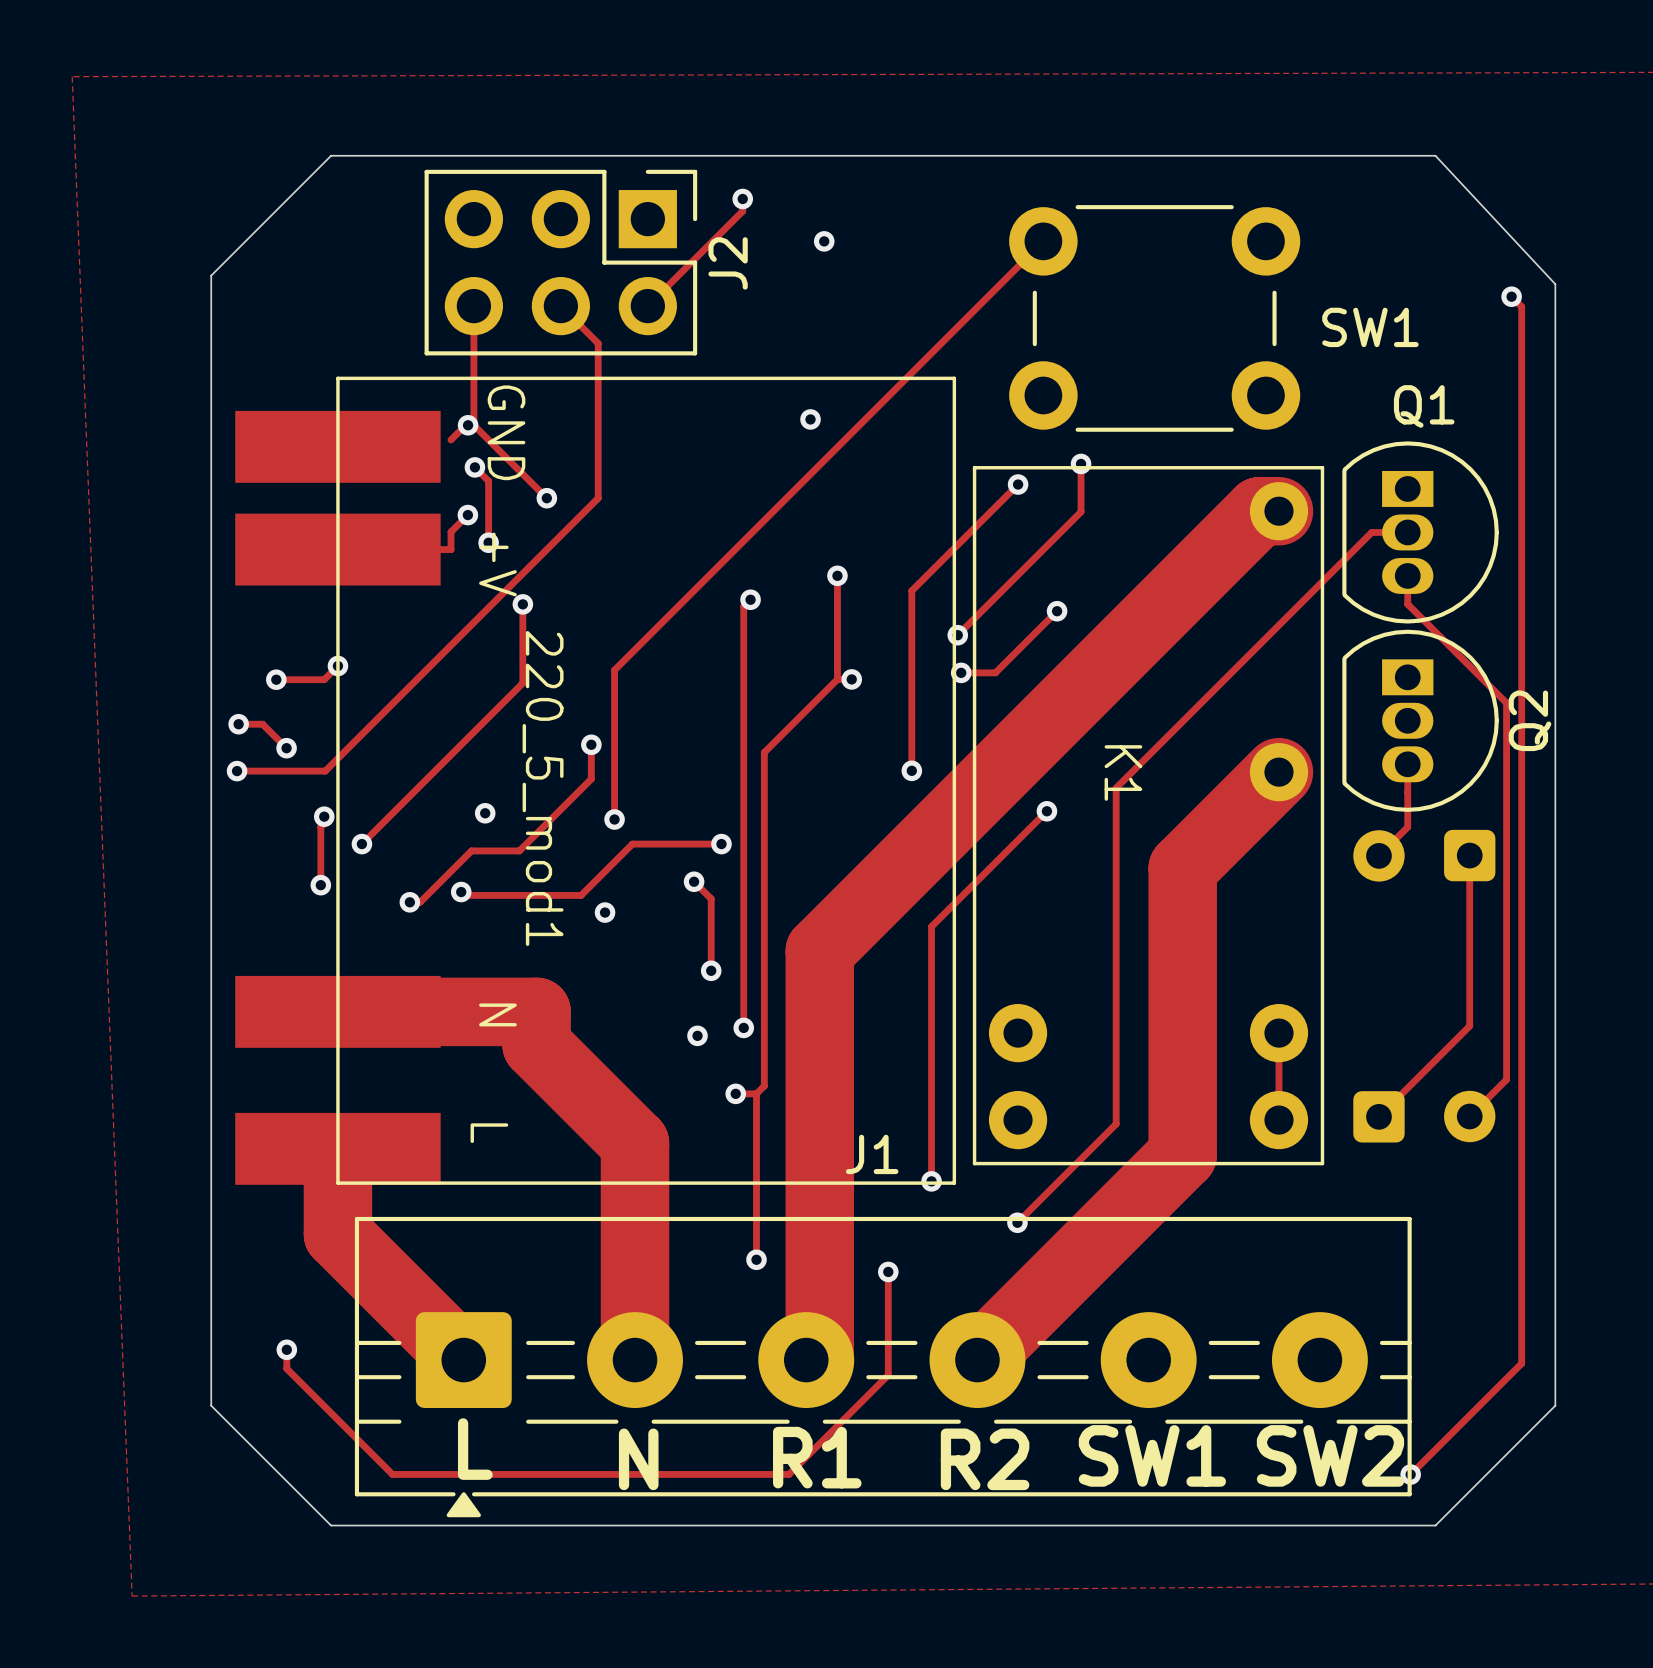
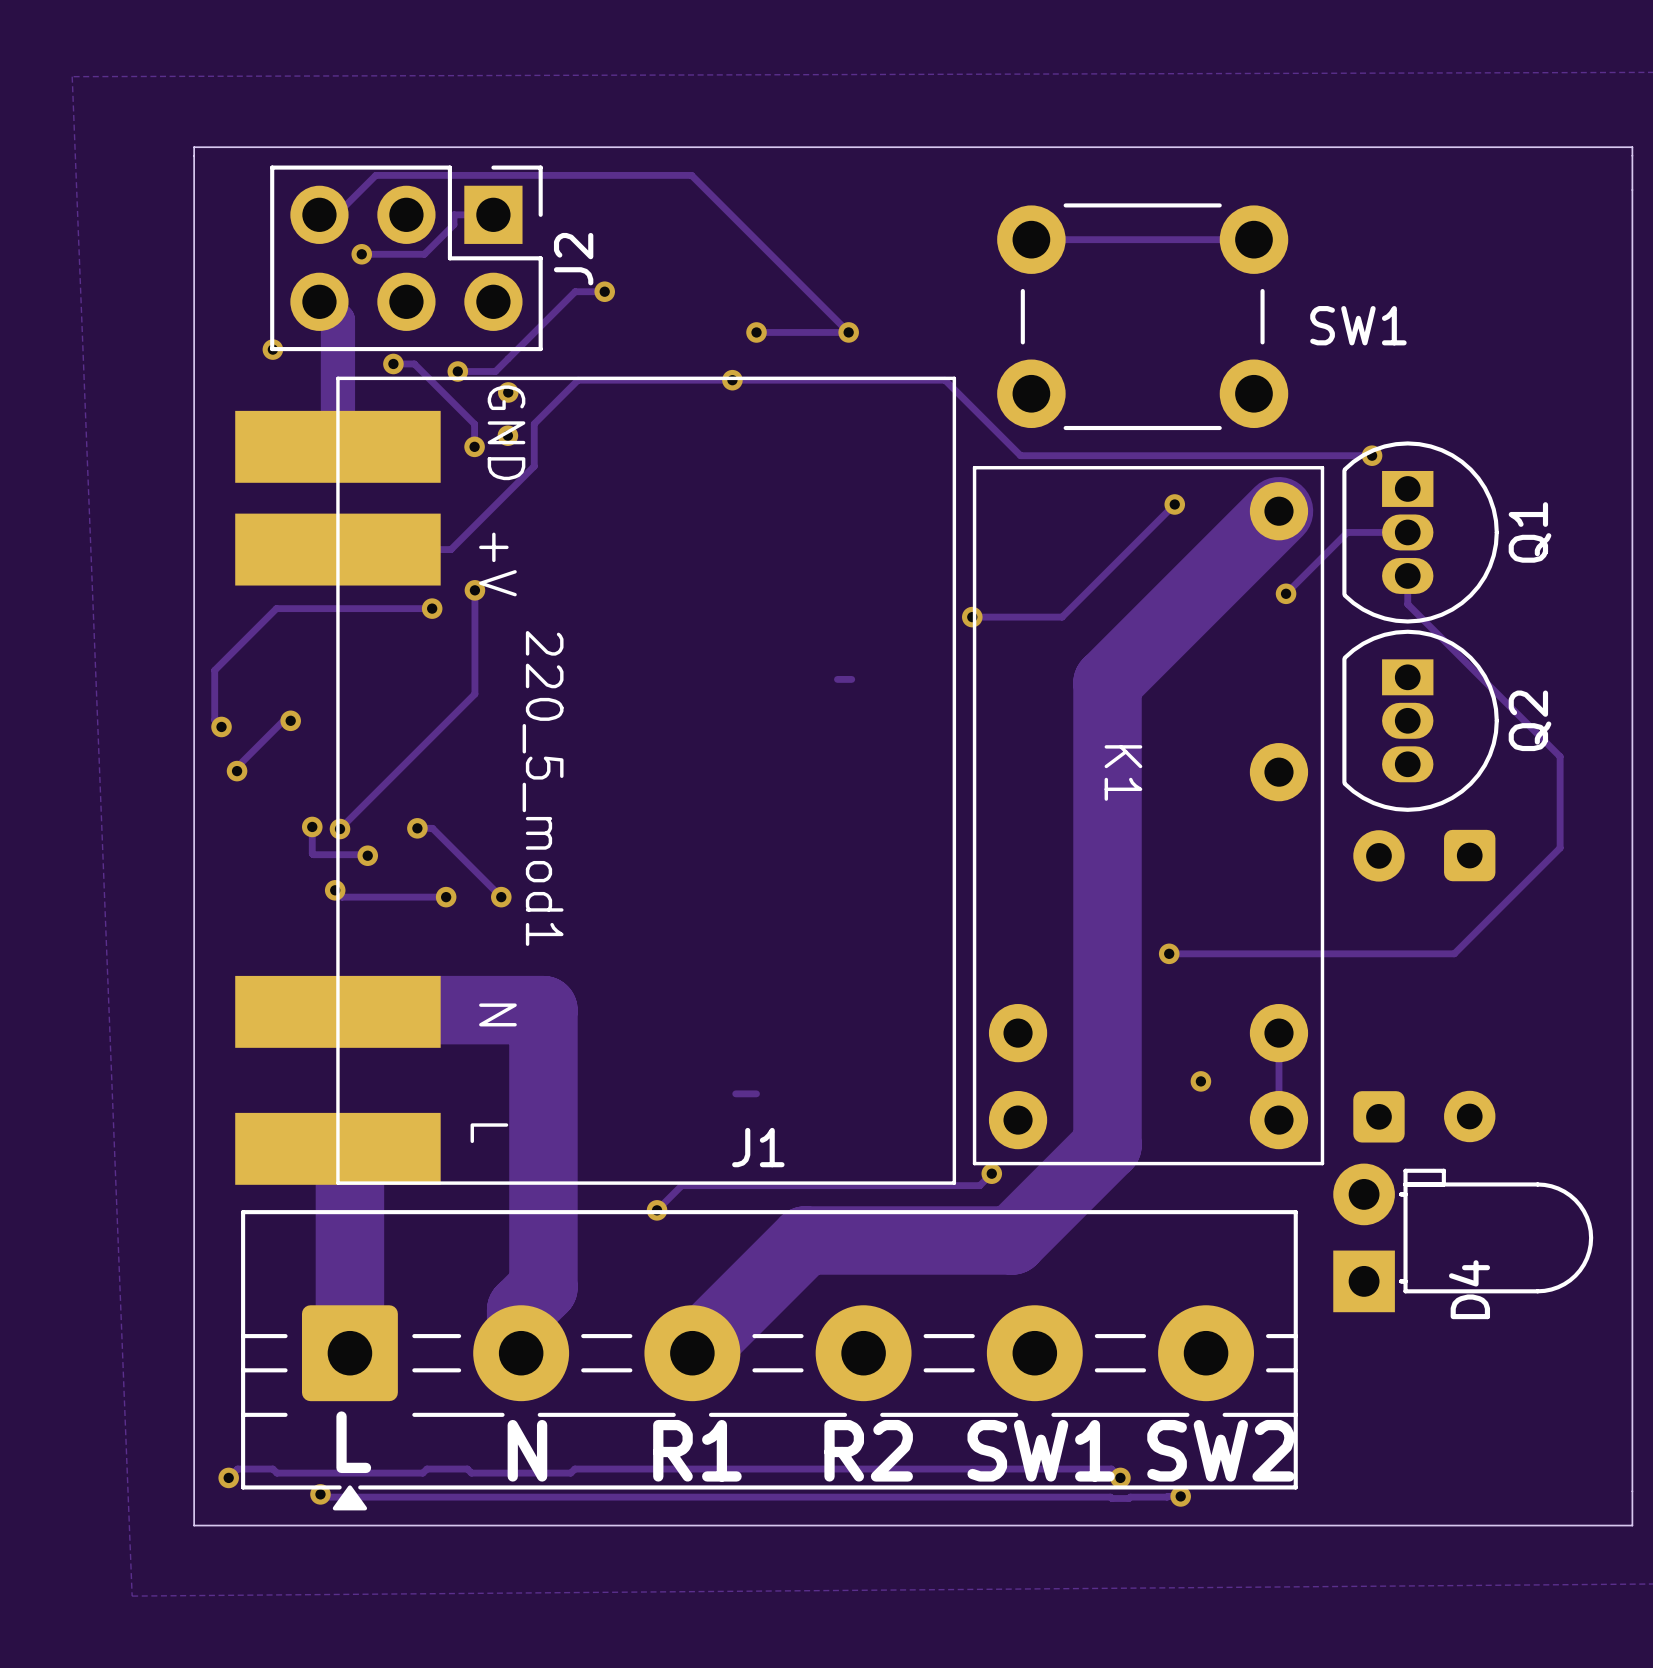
track: (742, 198) (742, 211) (647, 306) -> none
via: (742, 198) -> none
track: none -> (319, 214) (336, 214) (375, 175) (691, 175) (848, 332) (756, 332)
track: none -> (493, 214) (453, 214) (453, 224) (424, 254) (361, 254)
track: none -> (1031, 239) (1253, 239)
via: (824, 241) -> none
track: (1043, 241) (614, 670) (614, 819) -> none
via: none -> (361, 254)
J2 position: (560, 262) -> (406, 258)
track: none -> (604, 291) (575, 291) (495, 371) (457, 371)
via: none -> (604, 291)
track: (1511, 296) (1521, 306) (1521, 1363) (1410, 1474) -> none
via: (1511, 296) -> none
track: none -> (321, 301) (319, 301) (337, 320) (337, 446) (397, 446)
track: (473, 306) (473, 425) -> none
track: (560, 306) (598, 343) (598, 498) (325, 771) (237, 771) -> none
SW1 position: (1154, 318) -> (1142, 316)
via: none -> (756, 332)
via: none -> (848, 332)
via: none -> (272, 349)
track: none -> (393, 363) (414, 363) (474, 424) (474, 446)
via: none -> (393, 363)
via: none -> (457, 371)
via: none -> (732, 380)
via: none -> (508, 392)
Q1 name rotation: 0° (1424, 406) -> 90° counterclockwise (1530, 532)
Q1 name position: Q1 (1424, 406) -> Q1 (1530, 532)
via: (810, 419) -> none
via: (468, 425) -> none
track: (473, 425) (465, 425) (450, 439) -> none
track: (473, 425) (546, 498) -> none
via: none -> (507, 435)
via: none -> (1372, 455)
track: (1081, 463) (1081, 511) (957, 635) -> none
via: (1081, 463) -> none
track: (474, 467) (488, 481) (488, 542) -> none
via position: (474, 467) -> (474, 446)
track: (1018, 484) (911, 590) (911, 770) -> none
via: (1018, 484) -> none
via: (546, 498) -> none
track: none -> (1174, 504) (1062, 617) (972, 617)
via: none -> (1174, 504)
track: (1278, 511) (1259, 511) (819, 951) (819, 1346) (806, 1360) -> (1278, 511) (1107, 682) (1107, 1145) (1012, 1240) (805, 1240) (692, 1353)
track: (467, 515) (451, 531) (451, 549) -> (1372, 455) (1020, 455) (945, 380) (578, 380) (534, 423) (534, 466) (451, 549)
via: (467, 515) -> none
track: (1371, 532) (1116, 788) (1116, 1124) (1017, 1222) -> (1371, 532) (1347, 532) (1286, 593)
via: (488, 542) -> none
track: (837, 575) (837, 679) (764, 752) (764, 1086) (756, 1093) (756, 1259) -> none
via: (837, 575) -> none
track: none -> (474, 590) (474, 694) (340, 829)
via: none -> (474, 590)
via: none -> (1286, 593)
track: (750, 599) (743, 606) (743, 1027) -> none
via: (750, 599) -> none
track: (522, 604) (522, 683) (361, 844) -> none
via: (522, 604) -> none
track: none -> (432, 608) (276, 608) (214, 670) (214, 720) (221, 726)
via: none -> (432, 608)
track: (1057, 611) (995, 672) (961, 672) -> none
via: (1057, 611) -> none
via position: (957, 635) -> (972, 617)
track: (337, 666) (324, 679) (276, 679) -> none
via: (337, 666) -> none
via: (961, 672) -> none
via: (276, 679) -> none
via: (851, 679) -> none
track: (1506, 703) (1506, 1079) (1469, 1116) -> (1506, 703) (1560, 756) (1560, 848) (1454, 953) (1169, 953)
track: none -> (290, 720) (283, 720) (241, 762)
via: none -> (290, 720)
track: (238, 724) (262, 724) (286, 748) -> none
via position: (238, 724) -> (221, 726)
track: (591, 744) (591, 779) (519, 850) (471, 850) (420, 902) (409, 902) -> none
via: (591, 744) -> none
via: (286, 748) -> none
track: (1407, 764) (1407, 827) (1378, 855) -> none
via: (911, 770) -> none
track: (1278, 772) (1182, 868) (1182, 1154) (977, 1360) -> none
track: (1046, 811) (931, 926) (931, 1181) -> none
via: (1046, 811) -> none
via: (485, 813) -> none
track: (324, 816) (324, 823) (320, 826) (320, 885) -> none
via: (324, 816) -> none
via: (614, 819) -> none
track: none -> (312, 826) (313, 854) (367, 855)
via: none -> (312, 826)
track: none -> (417, 828) (432, 828) (501, 897)
via: none -> (417, 828)
via: none -> (340, 829)
via position: (361, 844) -> (367, 855)
track: (721, 844) (632, 844) (581, 895) (464, 895) (461, 892) -> none
via: (721, 844) -> none
track: (1469, 855) (1469, 1026) (1378, 1116) -> none
track: (694, 881) (711, 898) (711, 970) -> none
via: (694, 881) -> none
via position: (320, 885) -> (335, 890)
track: none -> (335, 890) (342, 897) (446, 897)
via position: (461, 892) -> (446, 897)
via: none -> (501, 897)
via: (409, 902) -> none
via: (605, 912) -> none
via: none -> (1169, 953)
via: (711, 970) -> none
track: none -> (337, 1010) (543, 1010) (543, 1287) (521, 1309) (521, 1353)
track: (337, 1011) (536, 1011) (536, 1044) (635, 1143) (635, 1360) -> none
via: (743, 1027) -> none
via: (697, 1035) -> none
via: none -> (1200, 1081)
via: (735, 1093) -> none
track: (337, 1148) (337, 1234) (463, 1360) -> none
track: none -> (337, 1150) (349, 1162) (349, 1353)
track: none -> (991, 1173) (979, 1185) (681, 1185) (657, 1210)
via: none -> (991, 1173)
via: (931, 1181) -> none
via: none -> (657, 1210)
via: (1017, 1222) -> none
D4: none -> (1463, 1237)
via: (756, 1259) -> none
track: (888, 1271) (888, 1375) (788, 1474) (392, 1474) (286, 1368) (286, 1349) -> none
via: (888, 1271) -> none
via: (286, 1349) -> none
J1 position: (883, 1367) -> (769, 1360)
text position: L (475, 1449) -> L (353, 1442)
text position: SW1 (1152, 1455) -> SW1 (1041, 1450)
text position: SW2 (1330, 1455) -> SW2 (1220, 1450)
text position: R1 (817, 1457) -> R1 (697, 1450)
text position: N (638, 1459) -> N (527, 1450)
text position: R2 (985, 1459) -> R2 (868, 1450)
via: (1410, 1474) -> none
track: none -> (228, 1477) (237, 1469) (272, 1469) (276, 1473) (422, 1473) (426, 1469) (467, 1469) (471, 1473) (570, 1473) (574, 1469) (1111, 1469) (1120, 1477)
via: none -> (228, 1477)
via: none -> (1120, 1477)
track: none -> (320, 1494) (323, 1497) (1128, 1498) (1180, 1496)
via: none -> (320, 1494)
via: none -> (1180, 1496)
board edge: (331, 1525) (211, 1405) (211, 275) (331, 155) (1435, 155) (1555, 284) (1555, 1405) (1435, 1525) -> (331, 1525) (194, 1525) (194, 147) (1632, 147) (1632, 1525) (1435, 1525)

